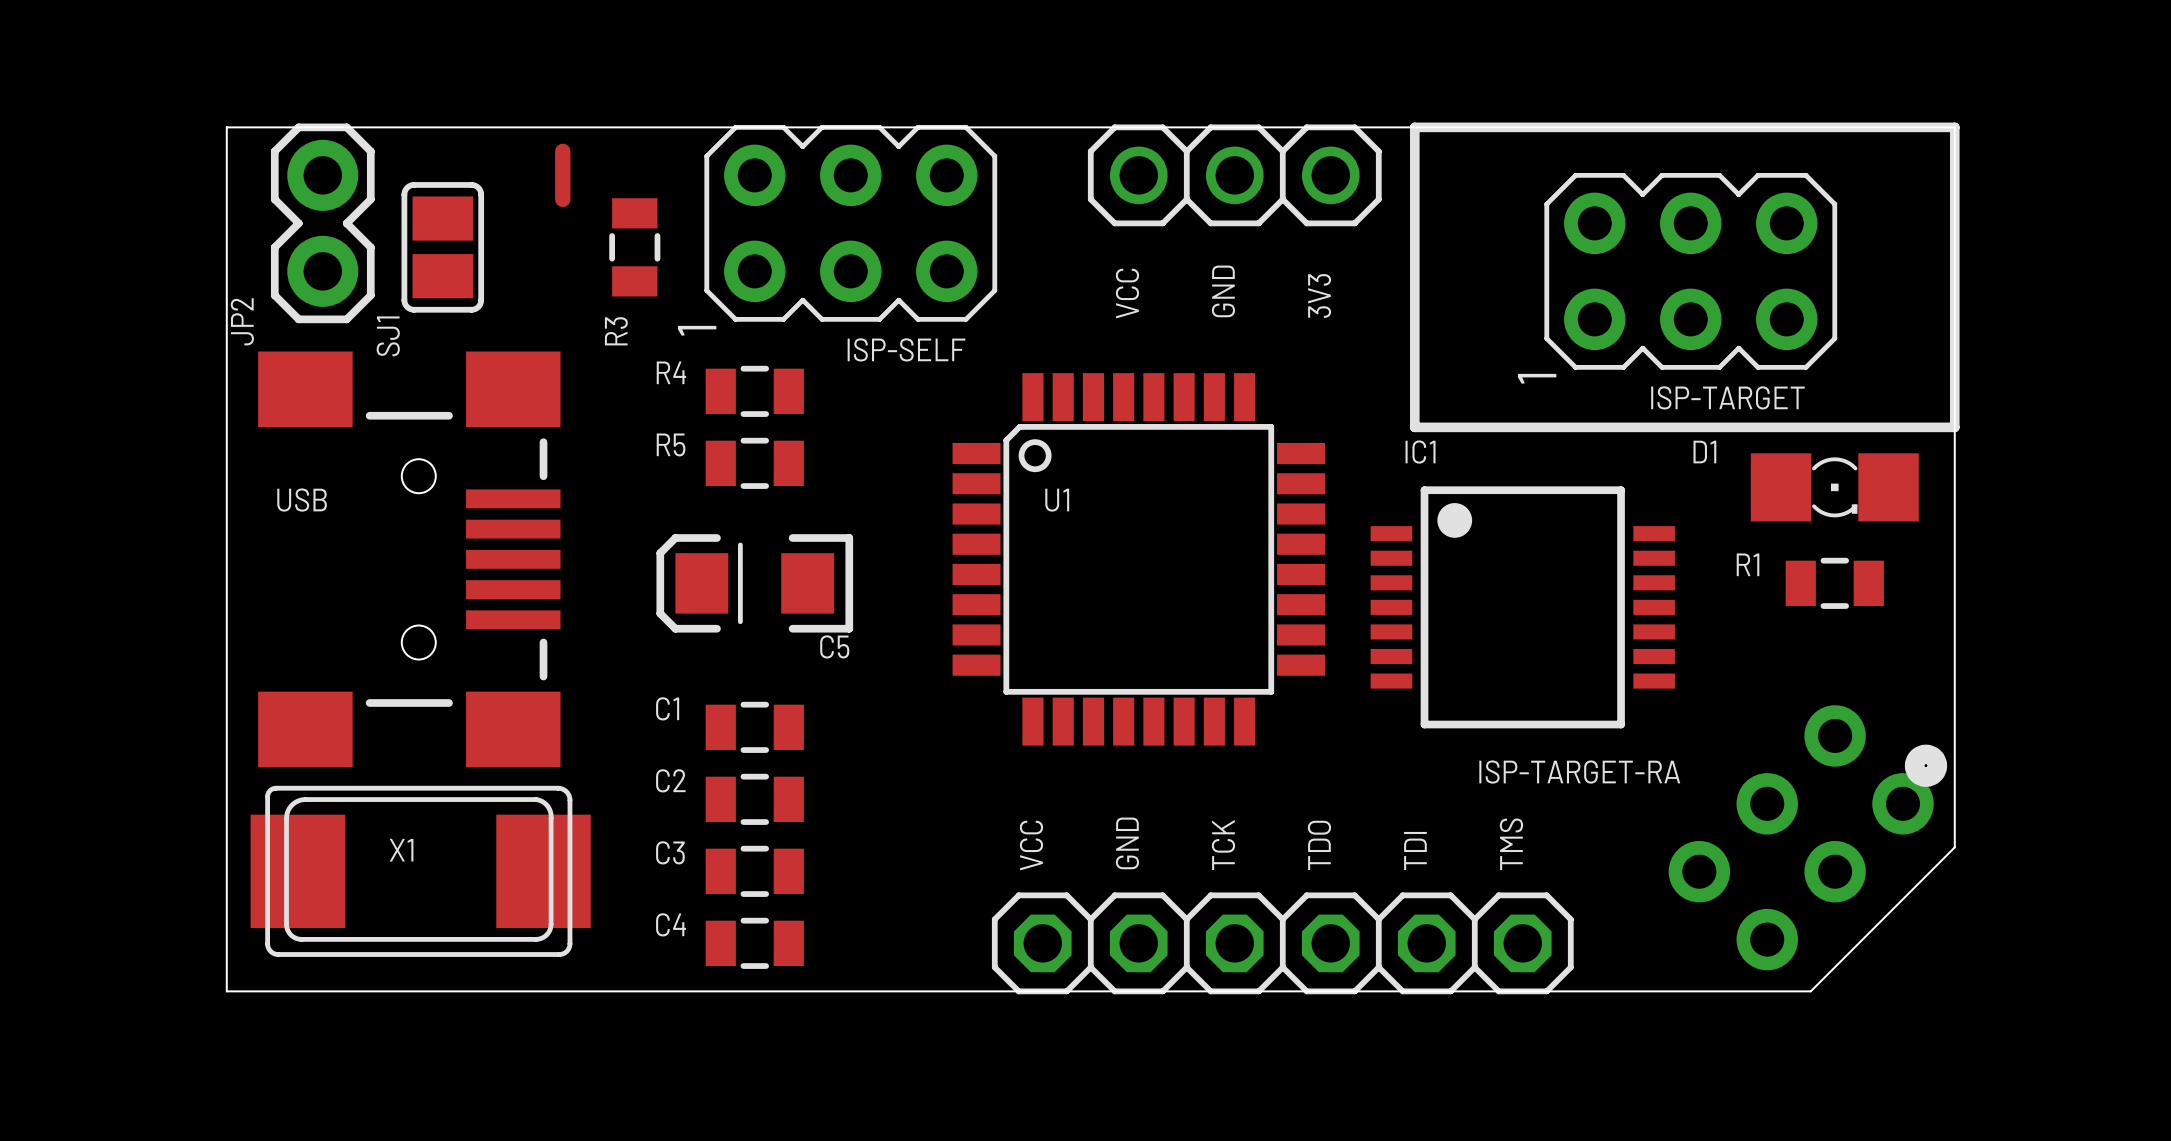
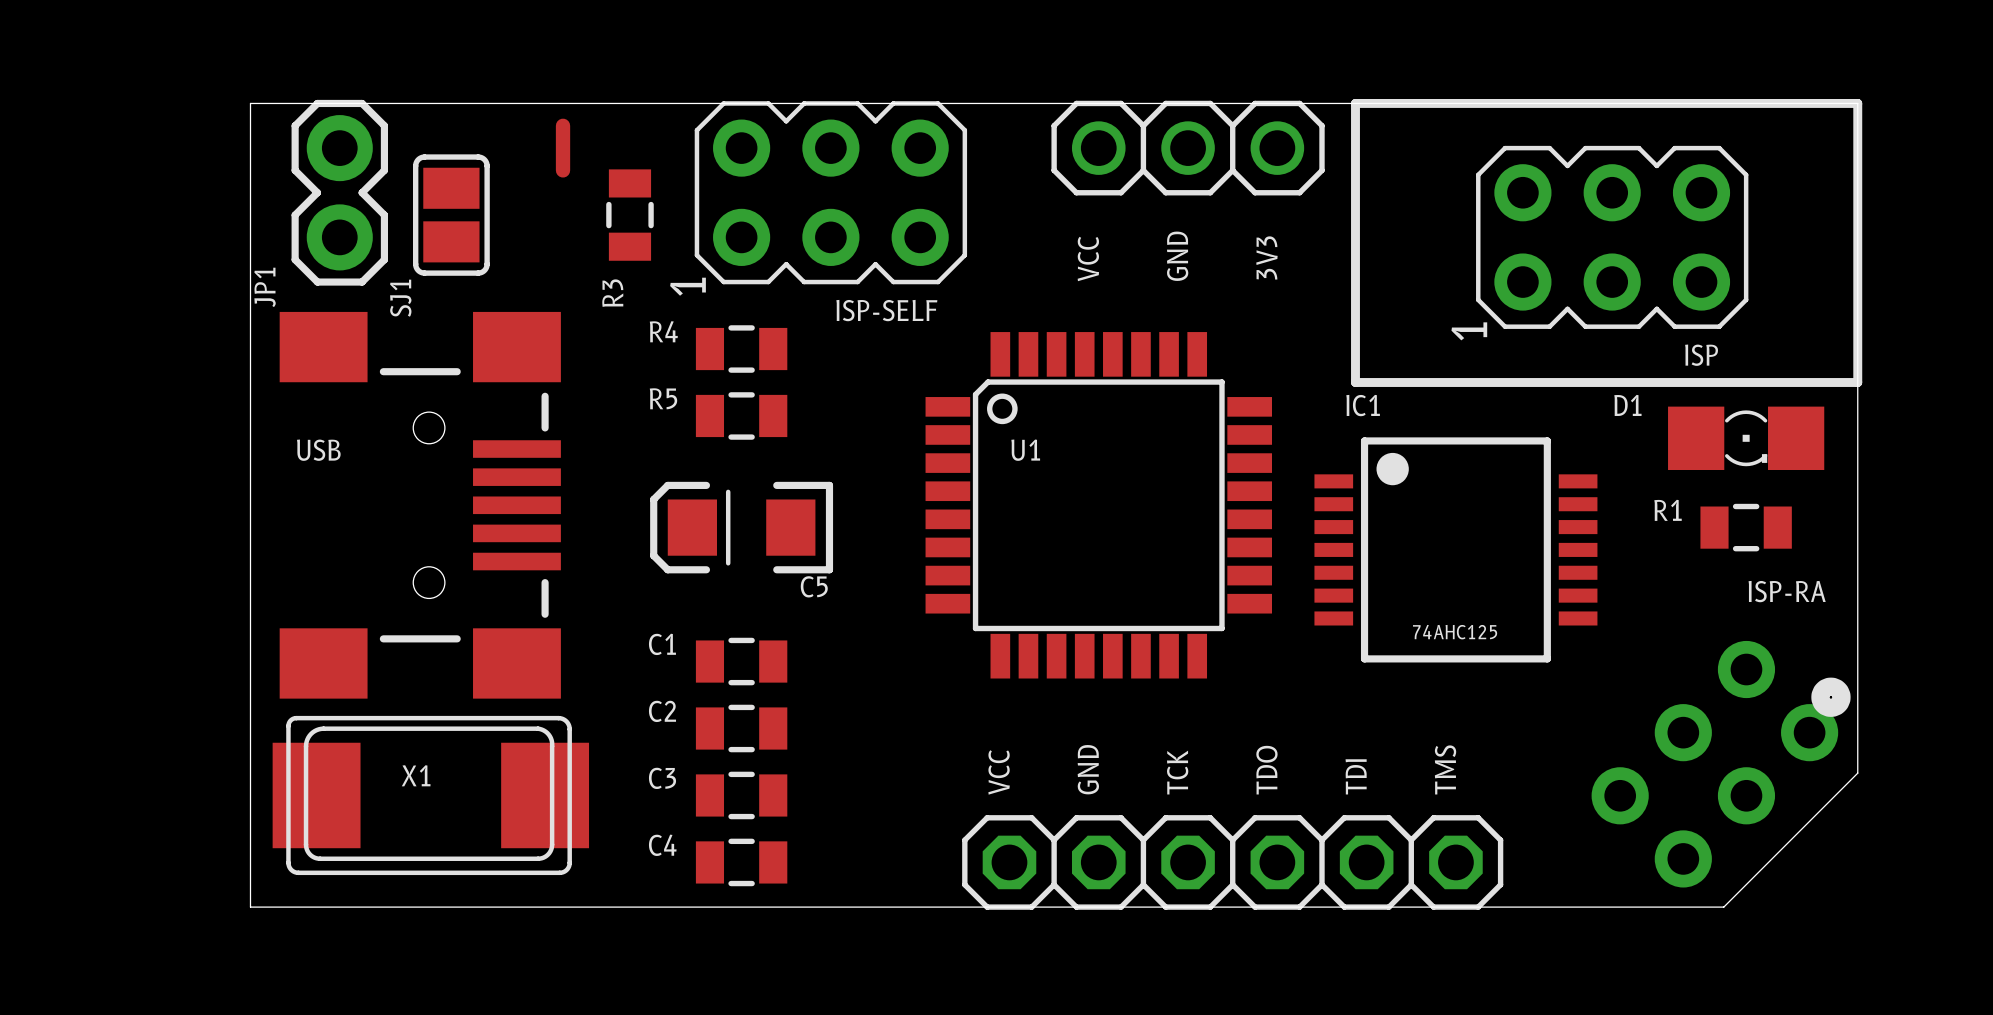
JP2 name: JP2 (242, 321) -> JP1 (265, 287)
ISP-TARGET name: ISP-TARGET (1727, 397) -> ISP (1701, 355)
text: none -> 74AHC125 (1455, 632)
ISP-TARGET-RA name: ISP-TARGET-RA (1579, 772) -> ISP-RA (1787, 591)

